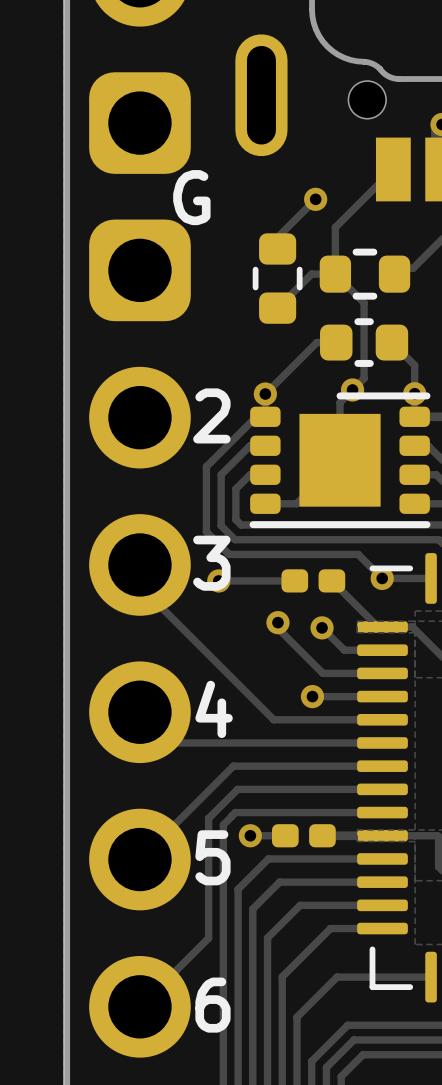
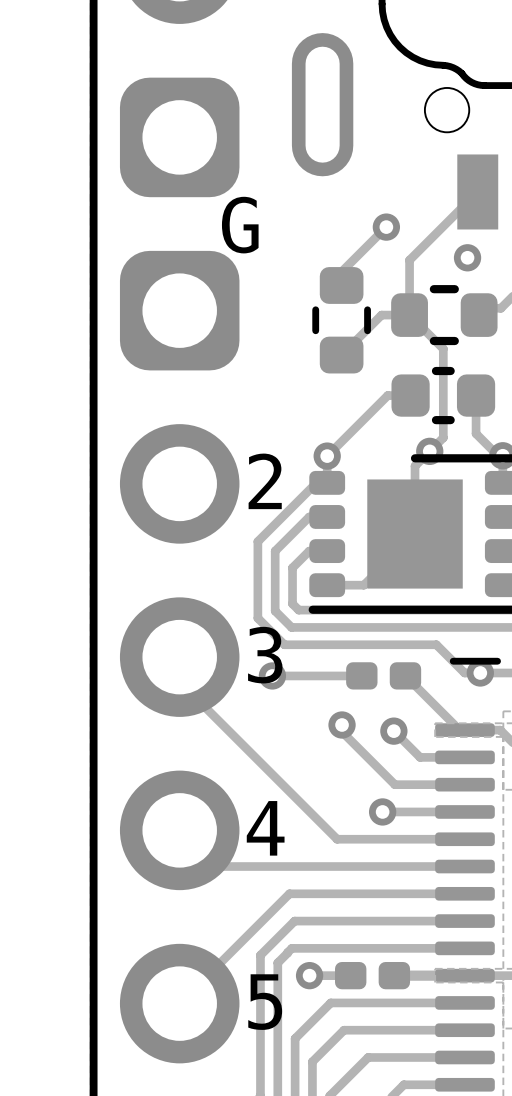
via: none -> (467, 257)
track: (391, 342) (414, 365) (414, 391) -> (476, 395) (476, 433) (502, 460)
via position: (382, 578) -> (480, 672)

